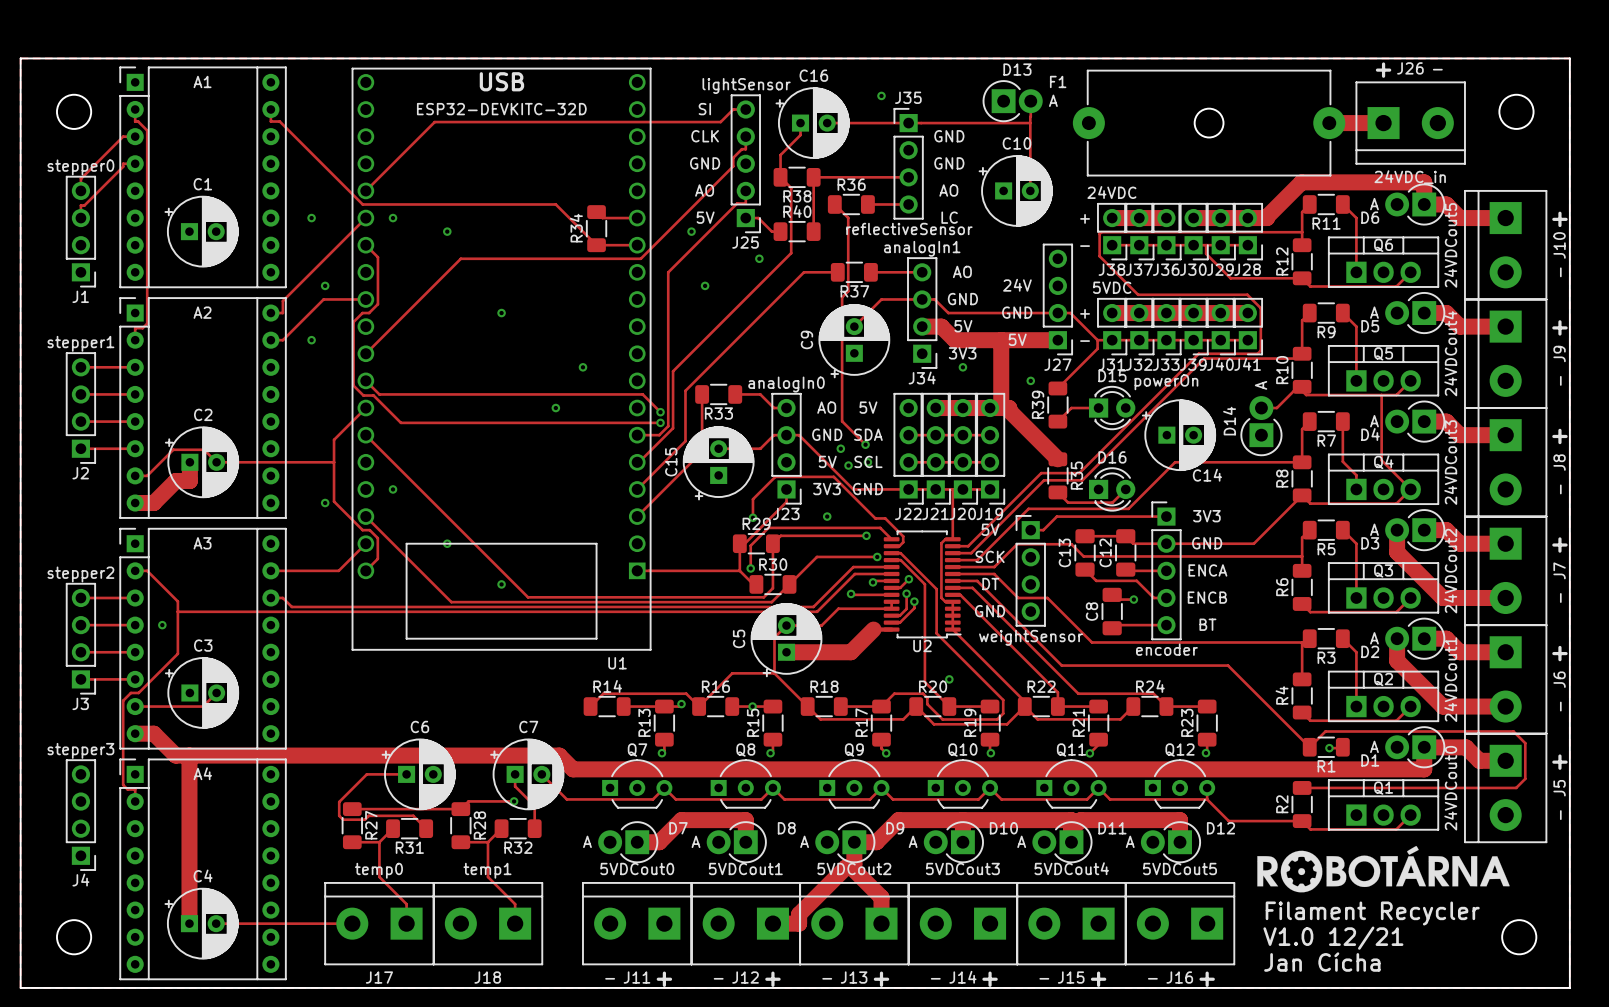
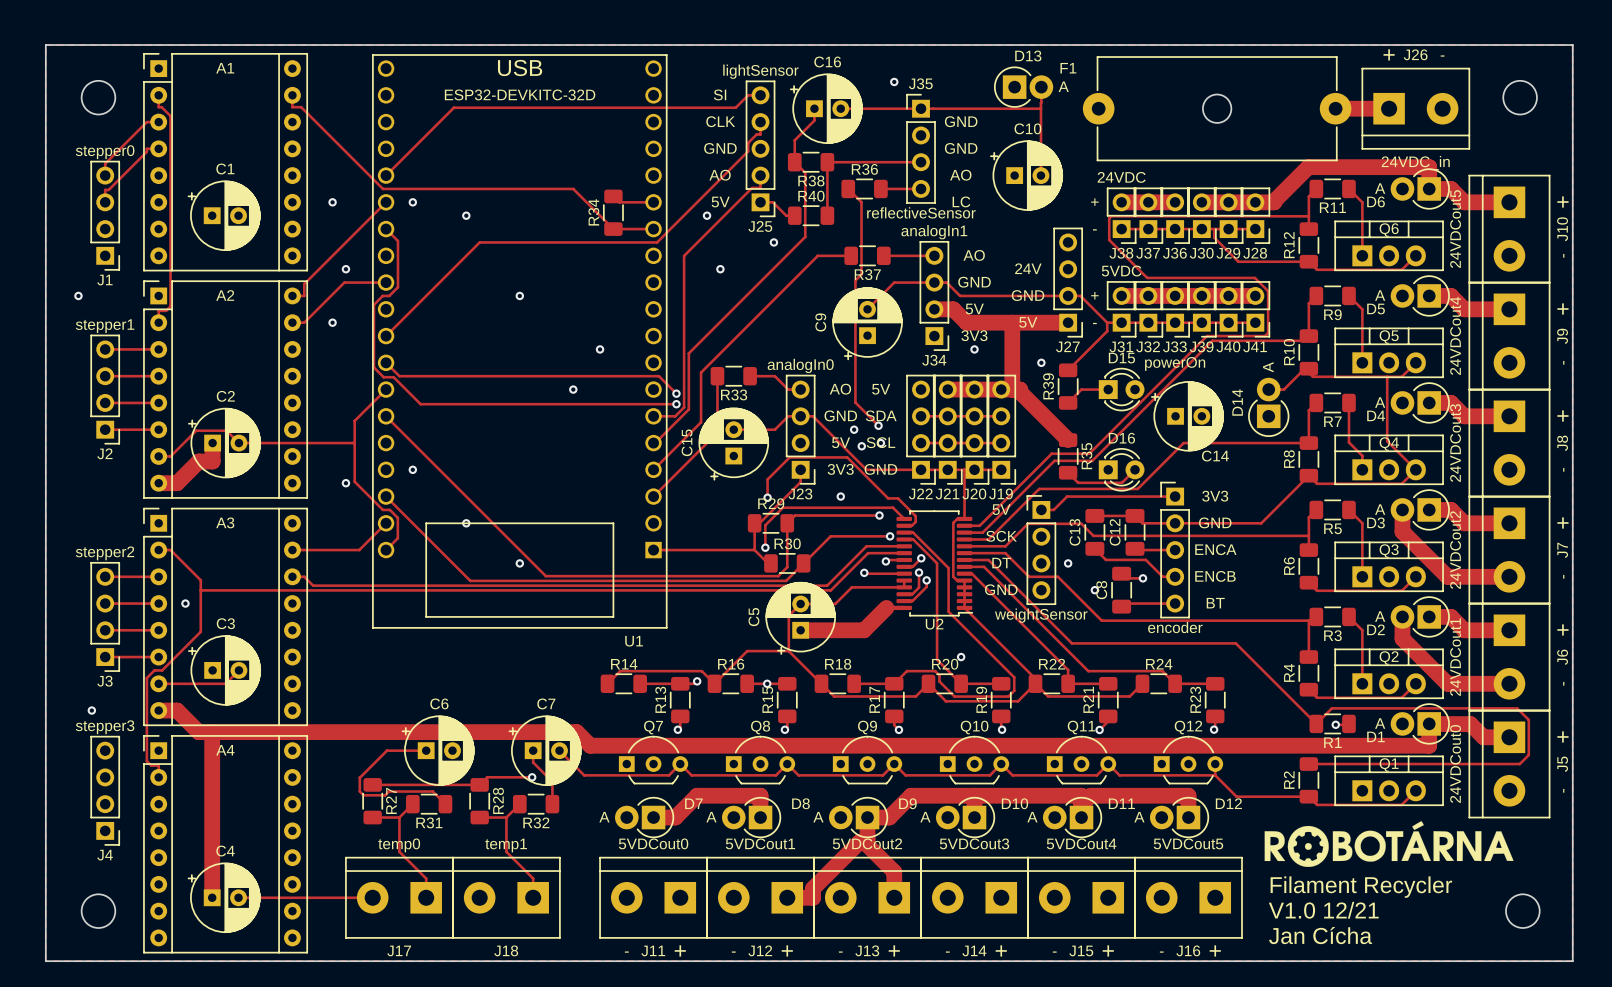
via: none -> (78, 295)
via: none -> (1068, 563)
via: none -> (1094, 590)
via: none -> (91, 710)

